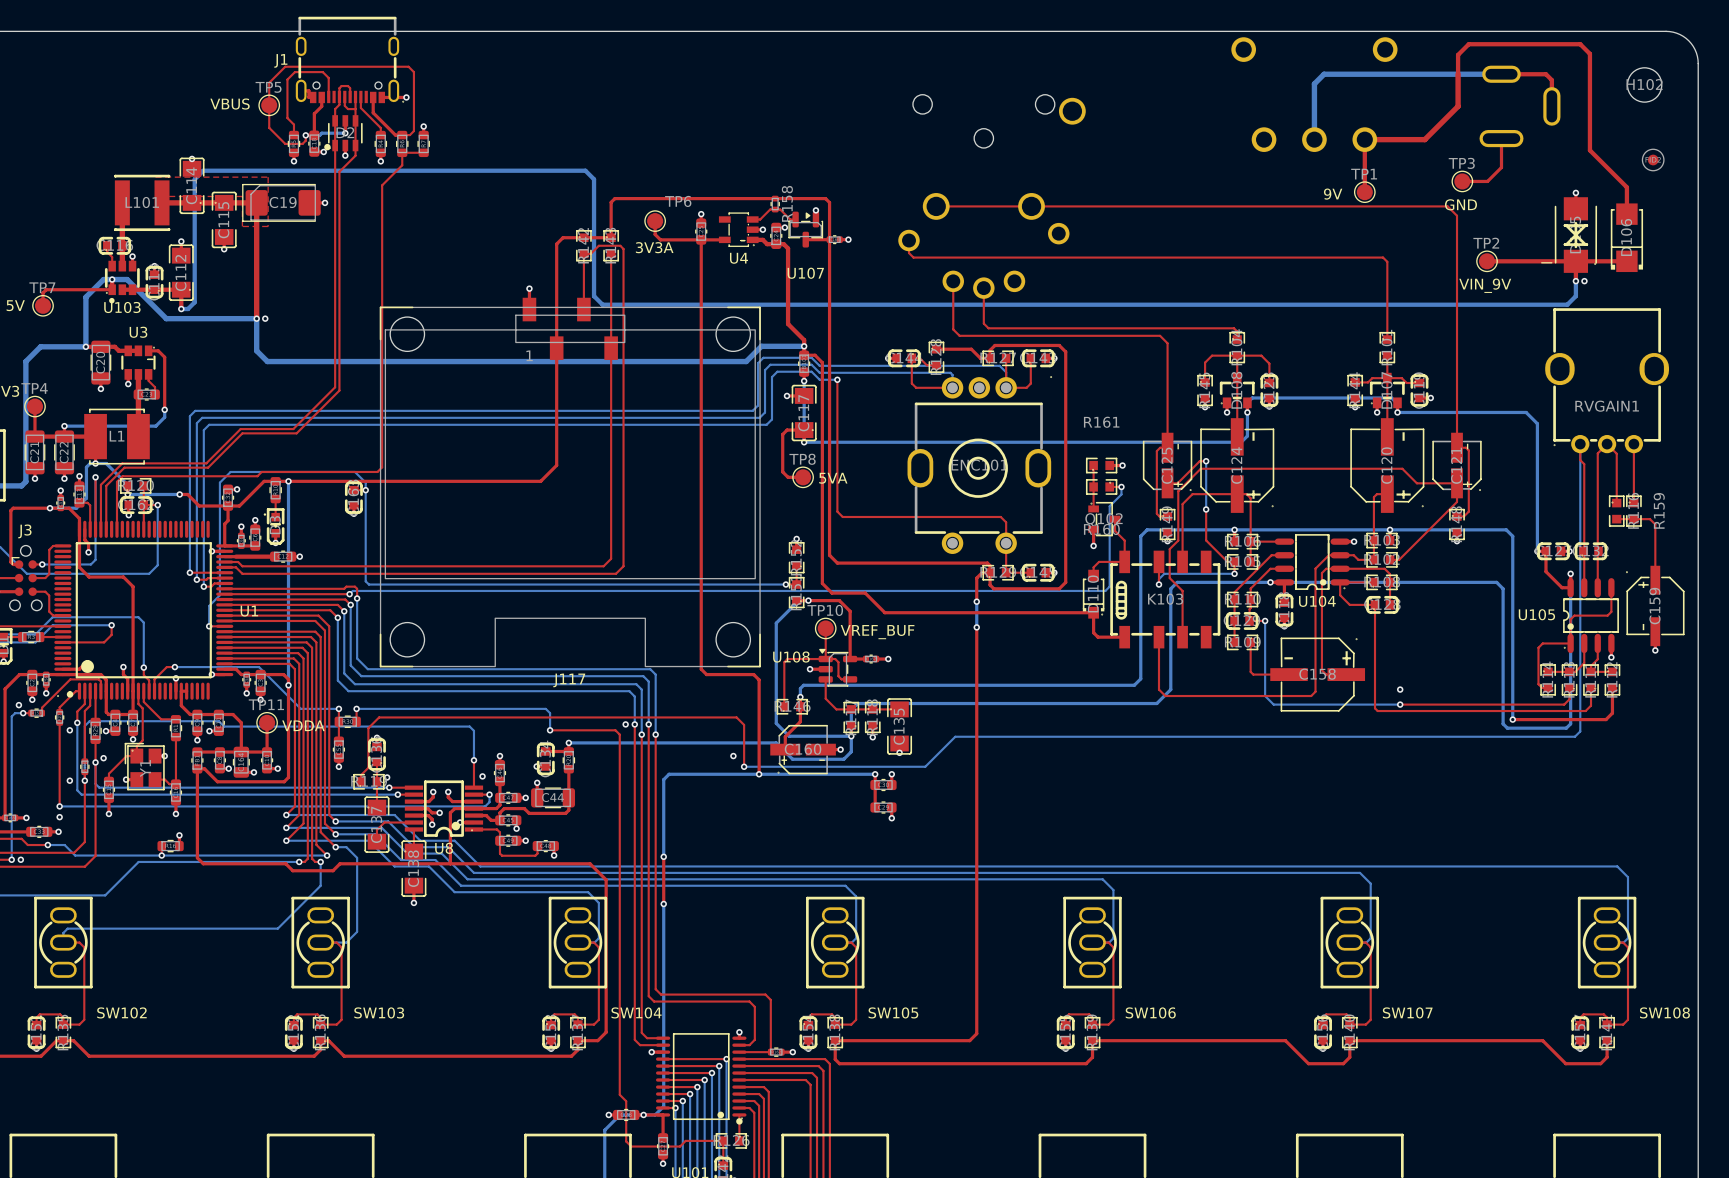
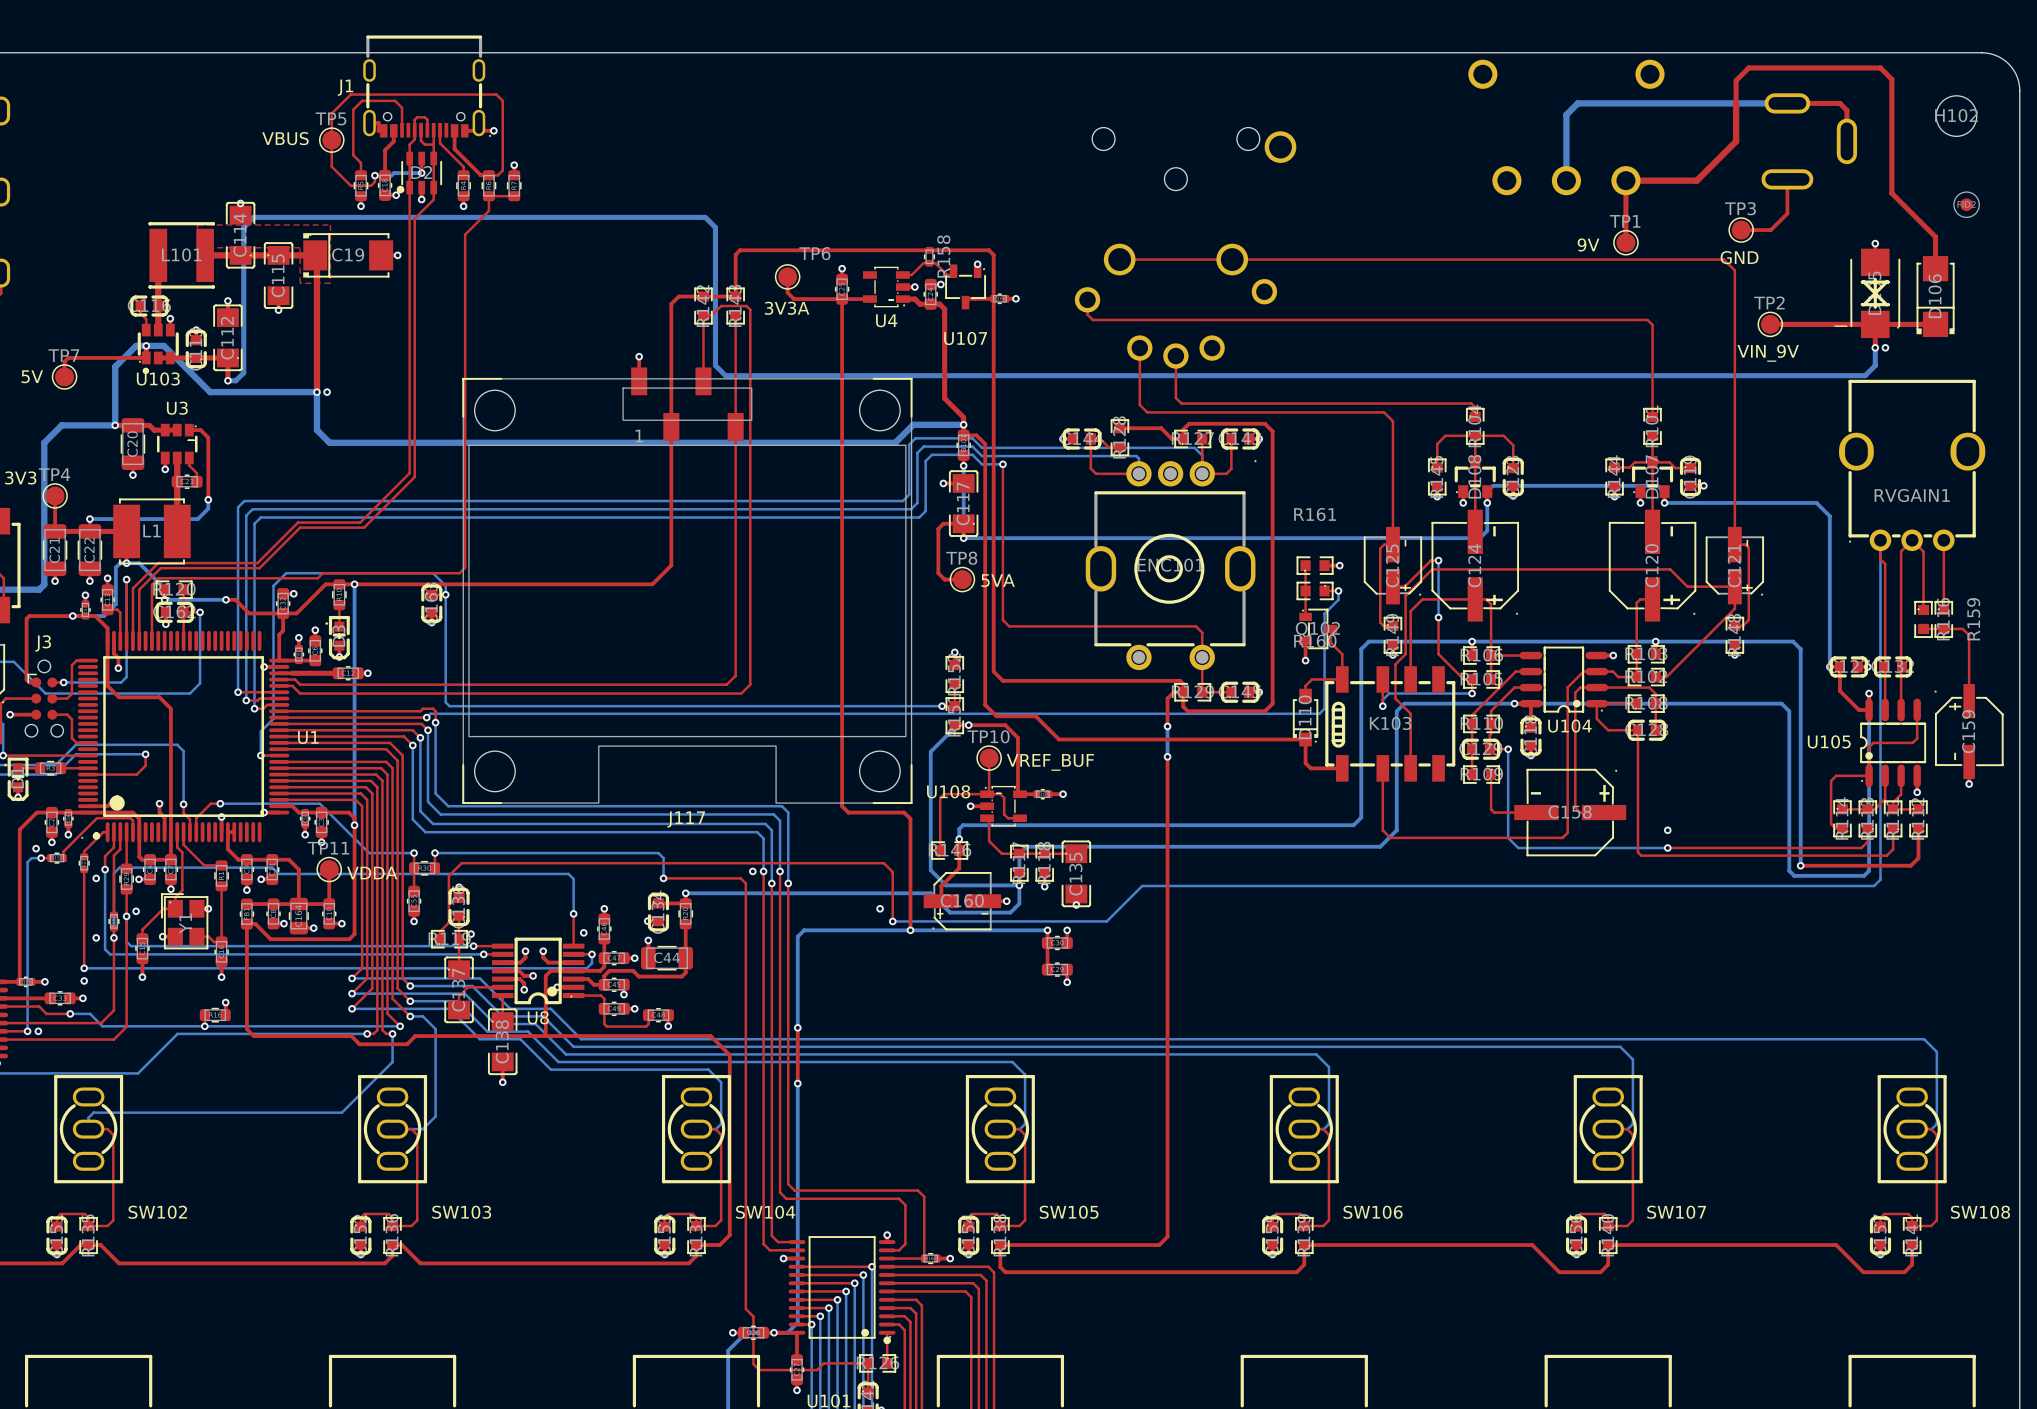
C19 footprint: [242, 183, 321, 222] -> [303, 233, 394, 278]
U107 footprint: [788, 211, 824, 248] -> [945, 264, 987, 310]
J117 footprint: [379, 297, 761, 668] -> [462, 367, 913, 805]
U108 footprint: [818, 648, 858, 687] -> [980, 785, 1027, 827]

